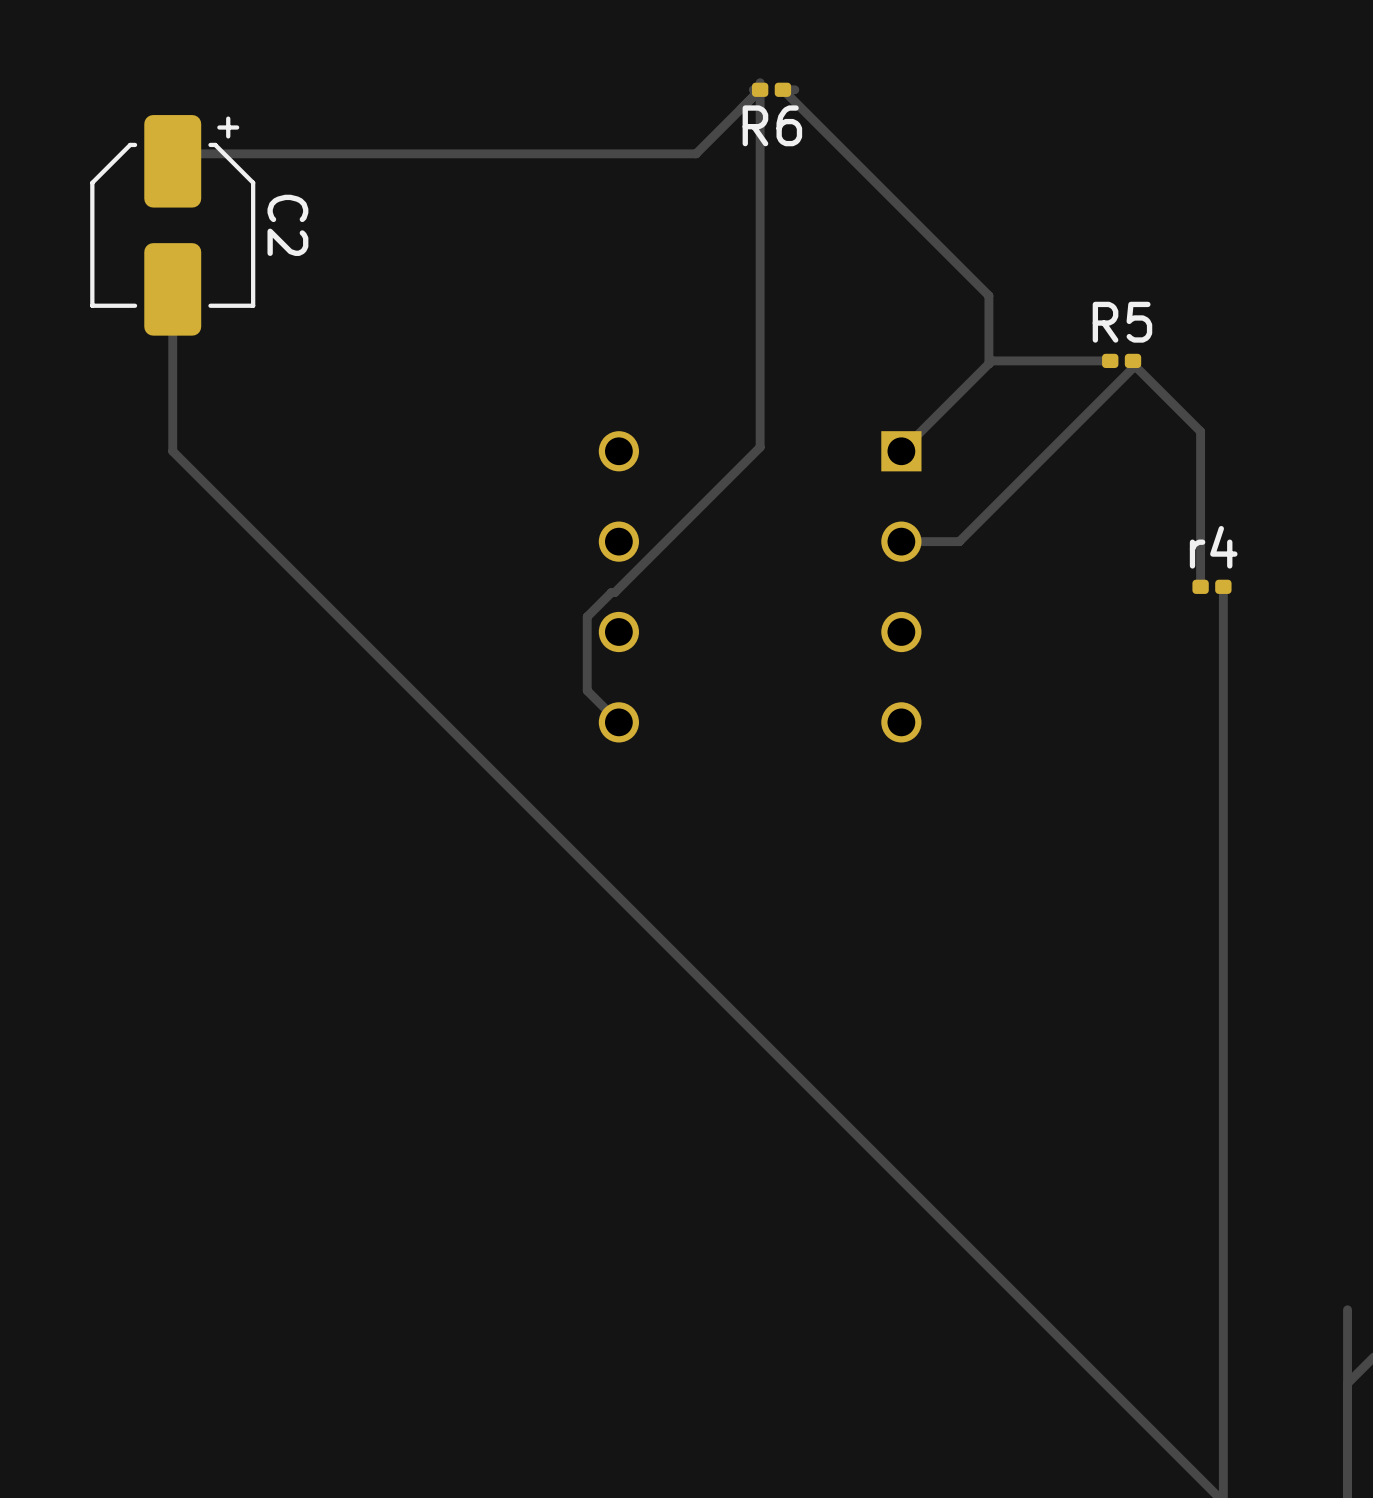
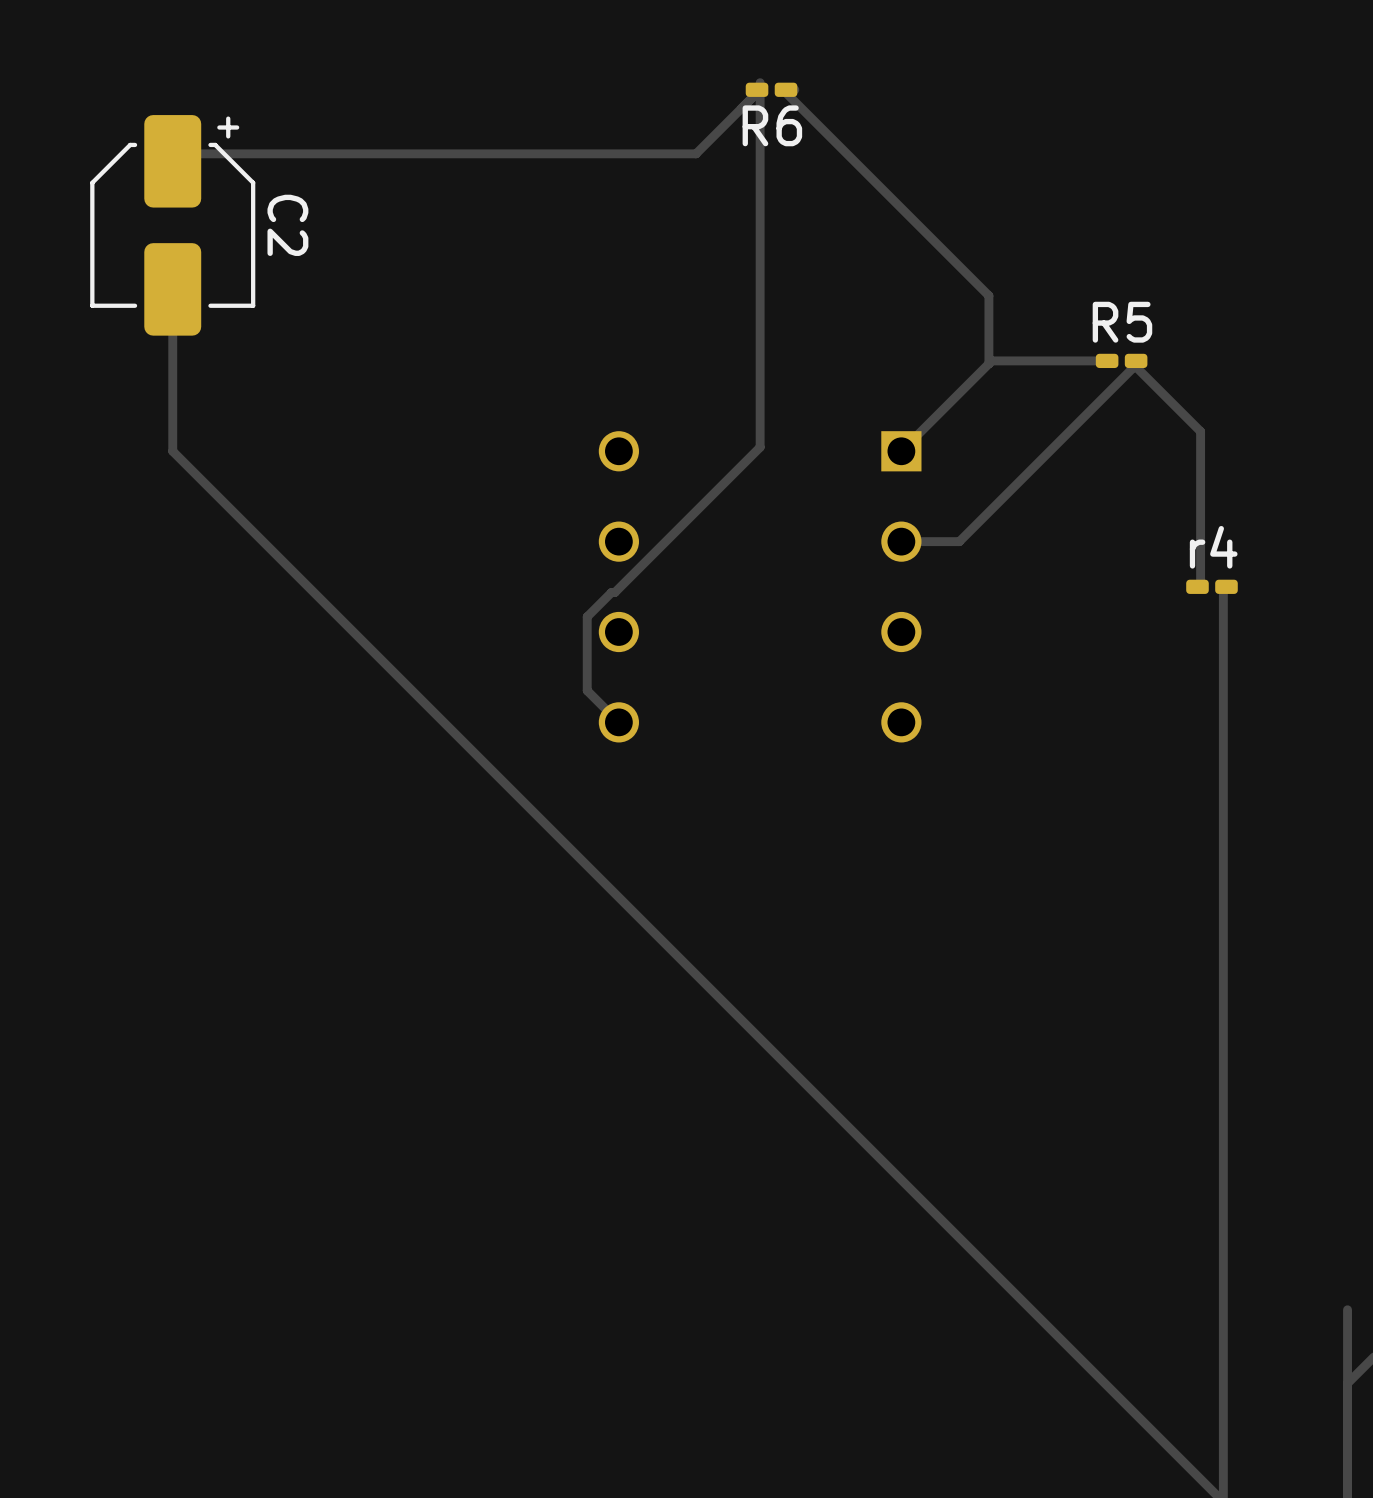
R6 footprint: [751, 82, 792, 97] -> [745, 82, 798, 97]
R5 footprint: [1102, 353, 1142, 369] -> [1095, 353, 1148, 369]
r4 footprint: [1192, 579, 1232, 594] -> [1186, 579, 1238, 594]

